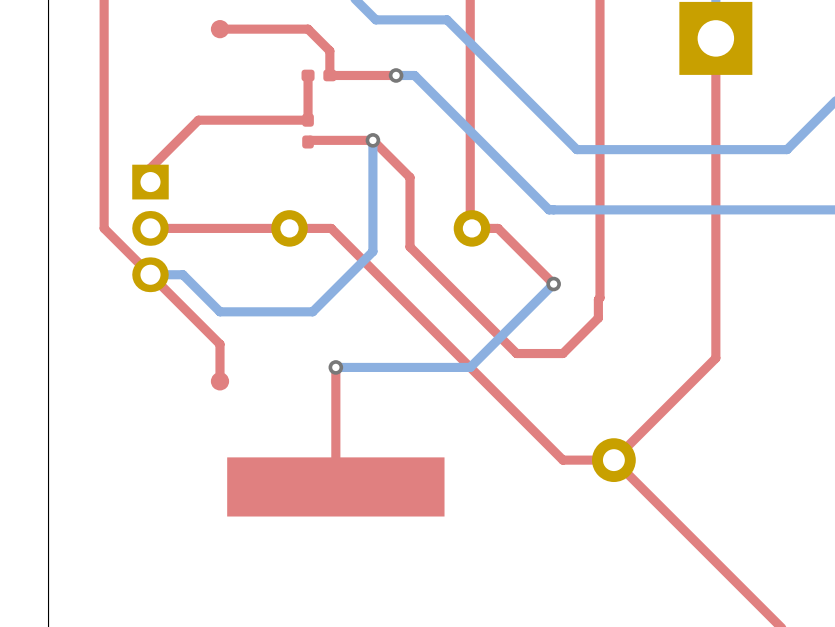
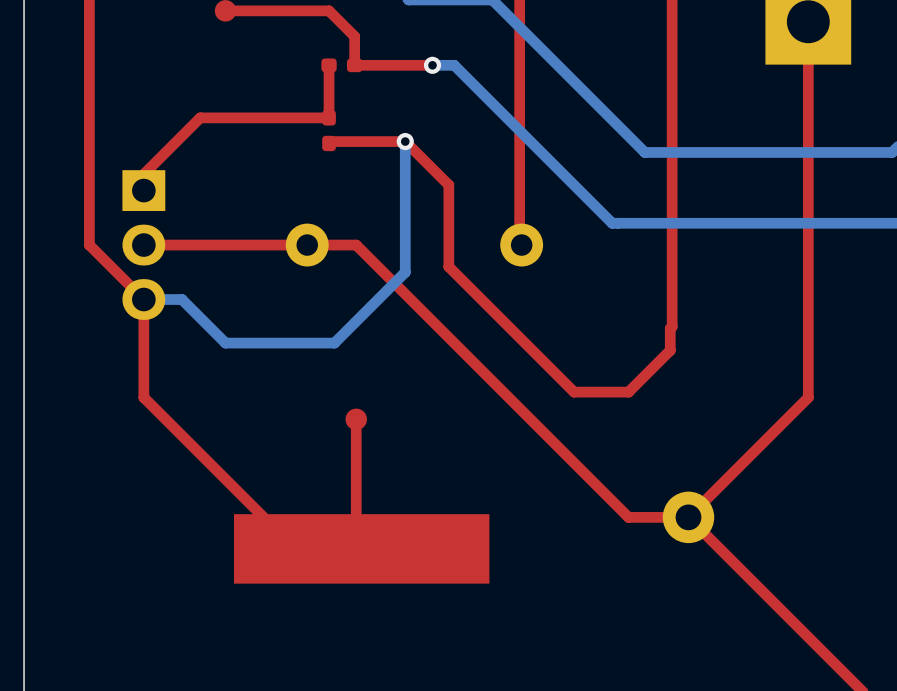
top track: (471, 228) (498, 228) (553, 284) -> none
top track: (150, 274) (219, 344) (219, 381) -> (143, 299) (143, 397) (295, 548) (361, 548) (356, 543) (356, 419)
bottom track: (553, 284) (470, 367) (335, 367) -> none
via: (553, 284) -> none
top track: (335, 367) (335, 486) -> none
via: (335, 367) -> none
part position: (219, 381) -> (356, 419)

